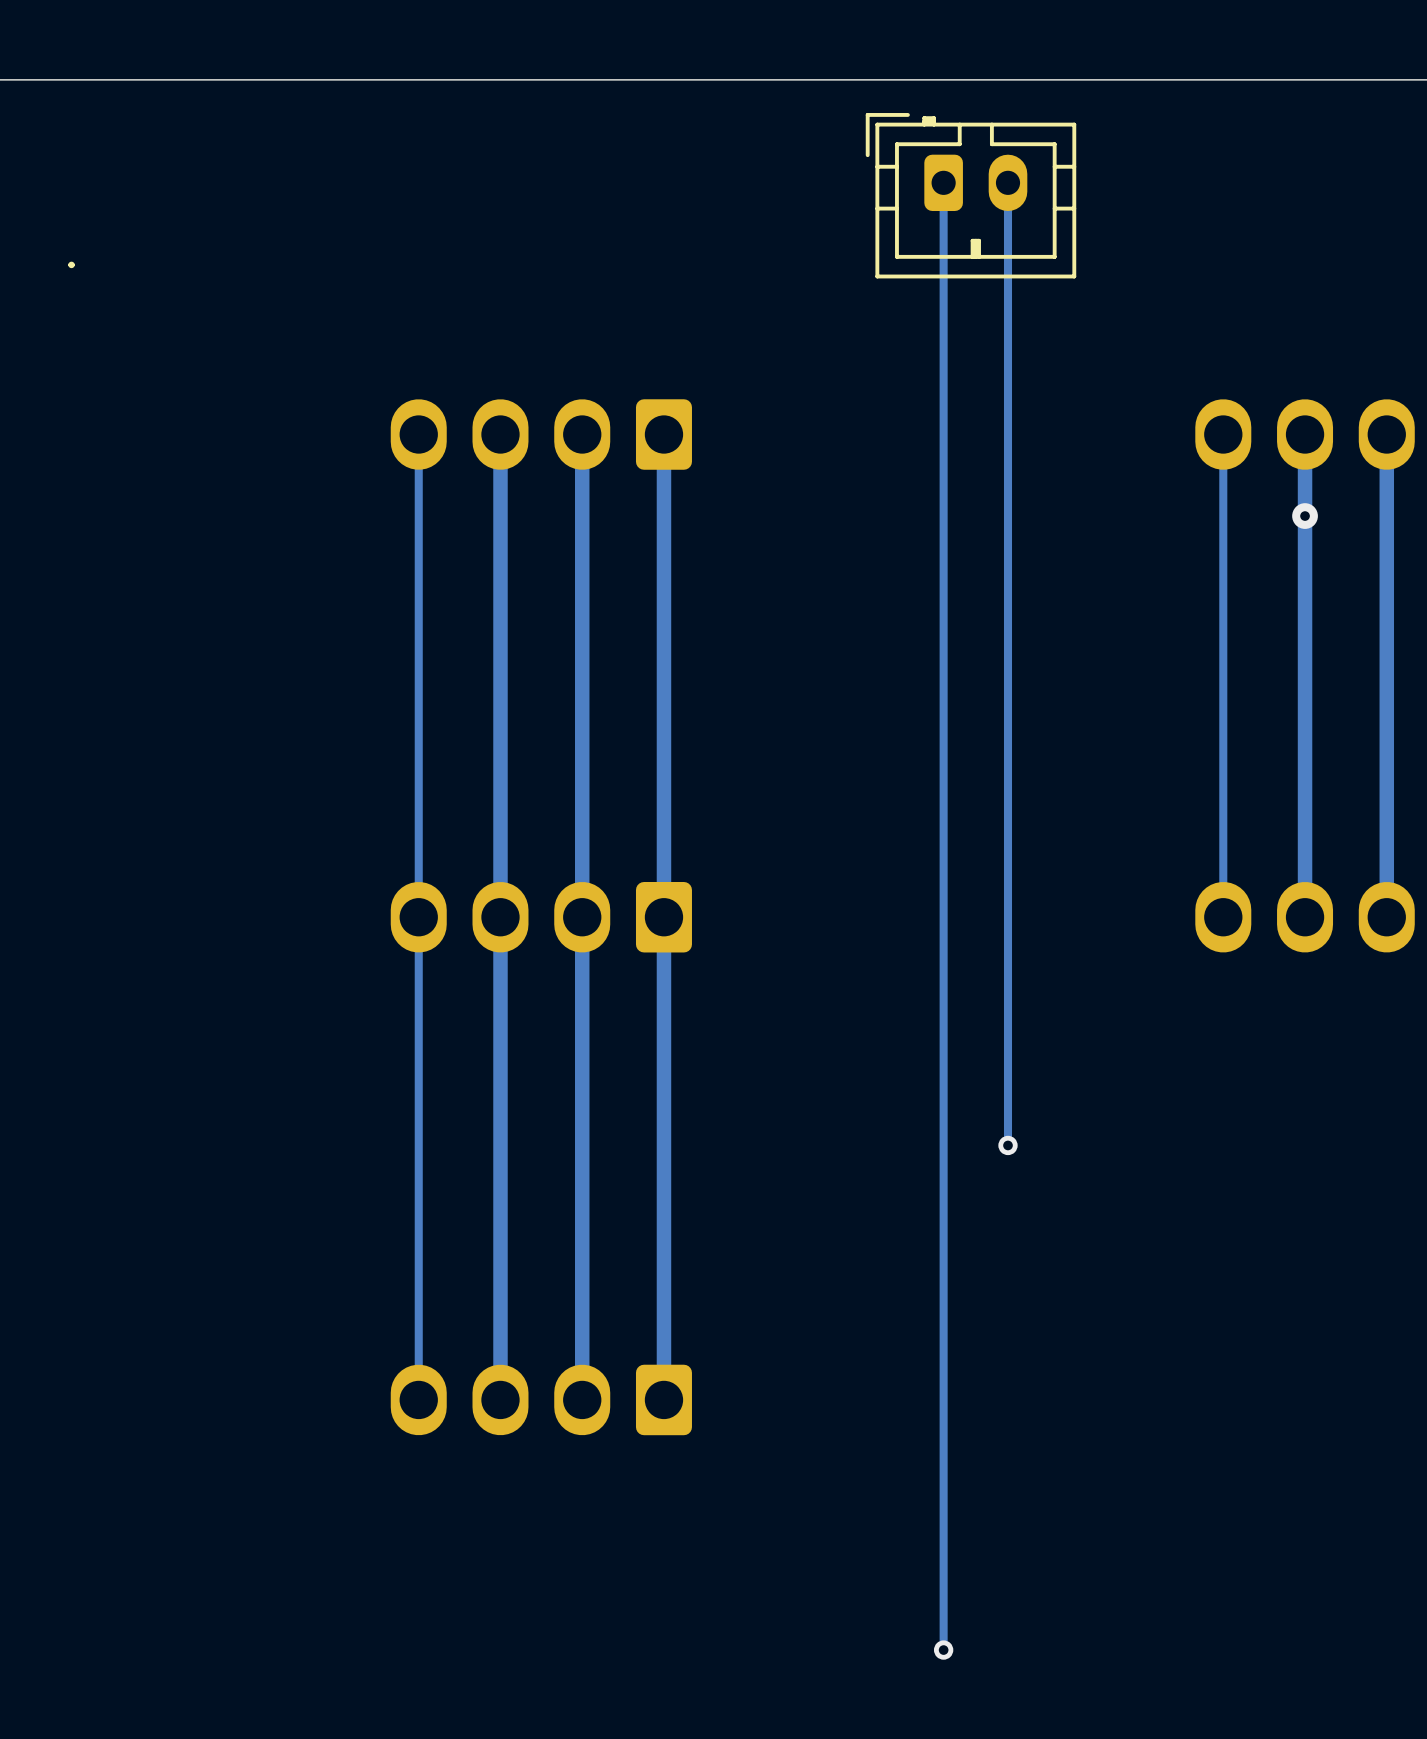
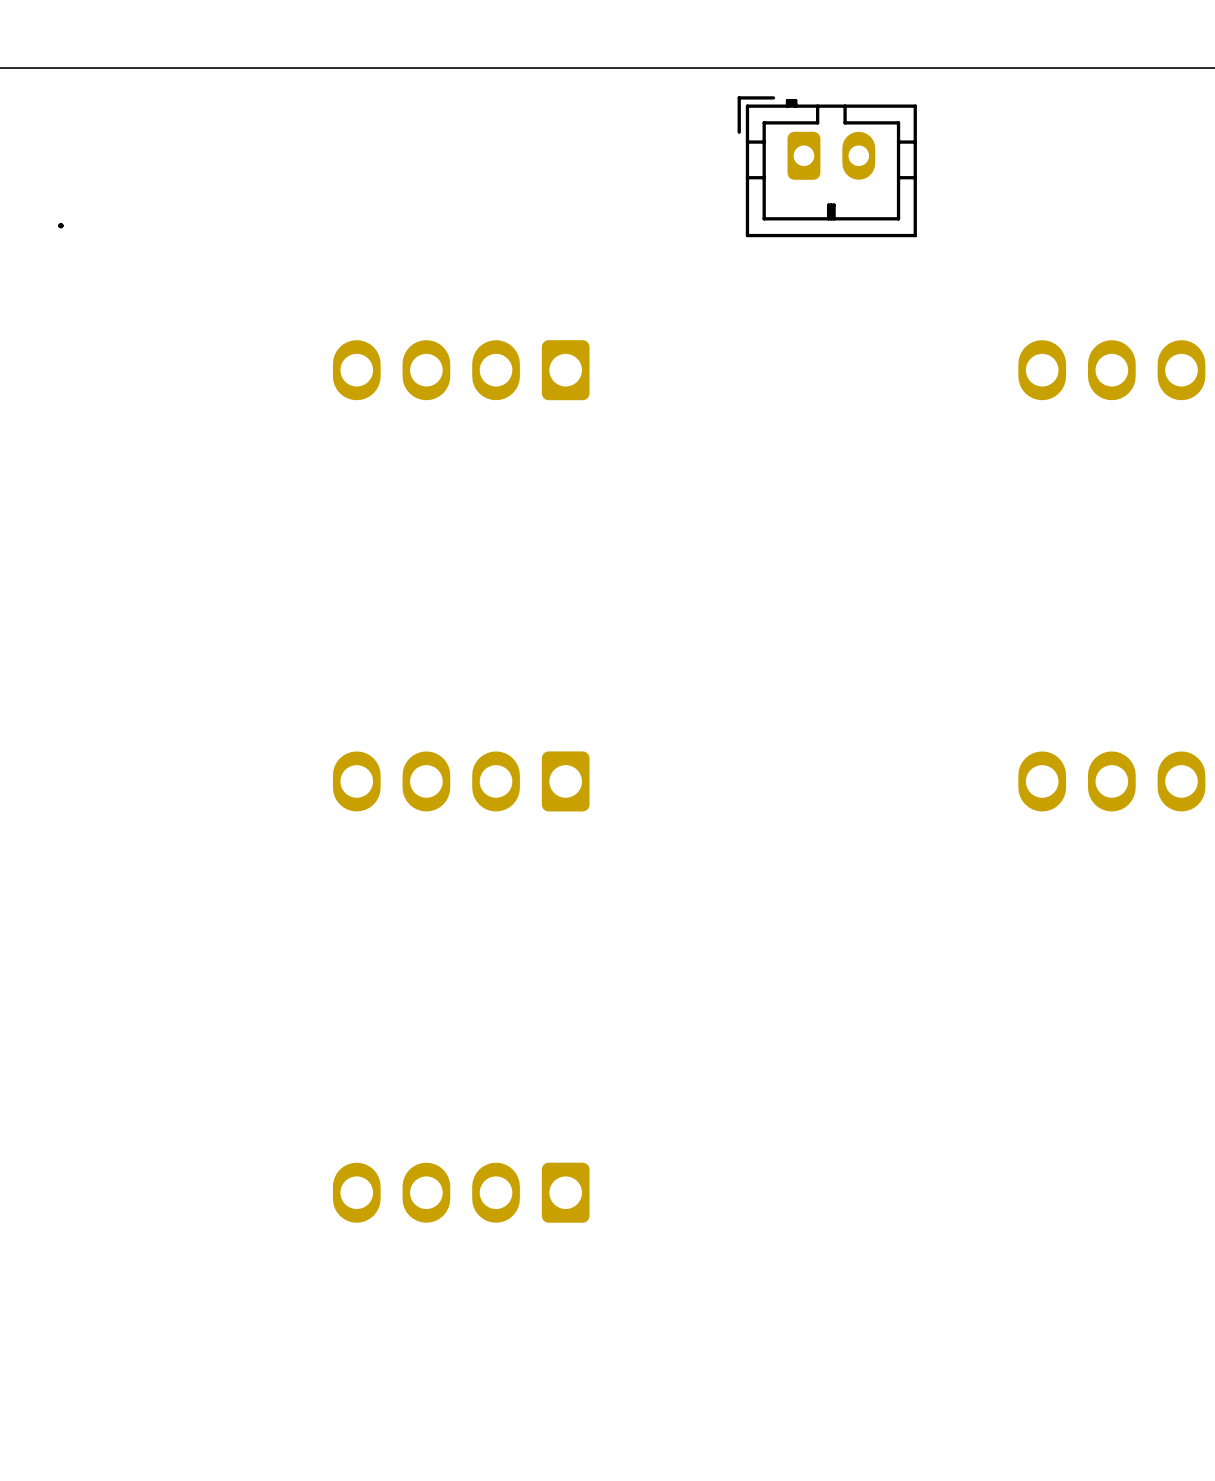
track: (943, 182) (943, 1650) -> none
track: (1008, 182) (1008, 1145) -> none
track: (418, 434) (418, 1399) -> none
track: (500, 434) (500, 1399) -> none
track: (582, 434) (582, 1399) -> none
track: (663, 434) (663, 1399) -> none
track: (1223, 434) (1223, 917) -> none
track: (1305, 434) (1305, 917) -> none
track: (1386, 434) (1386, 917) -> none
via: (1305, 516) -> none
via: (1008, 1145) -> none
via: (943, 1650) -> none

